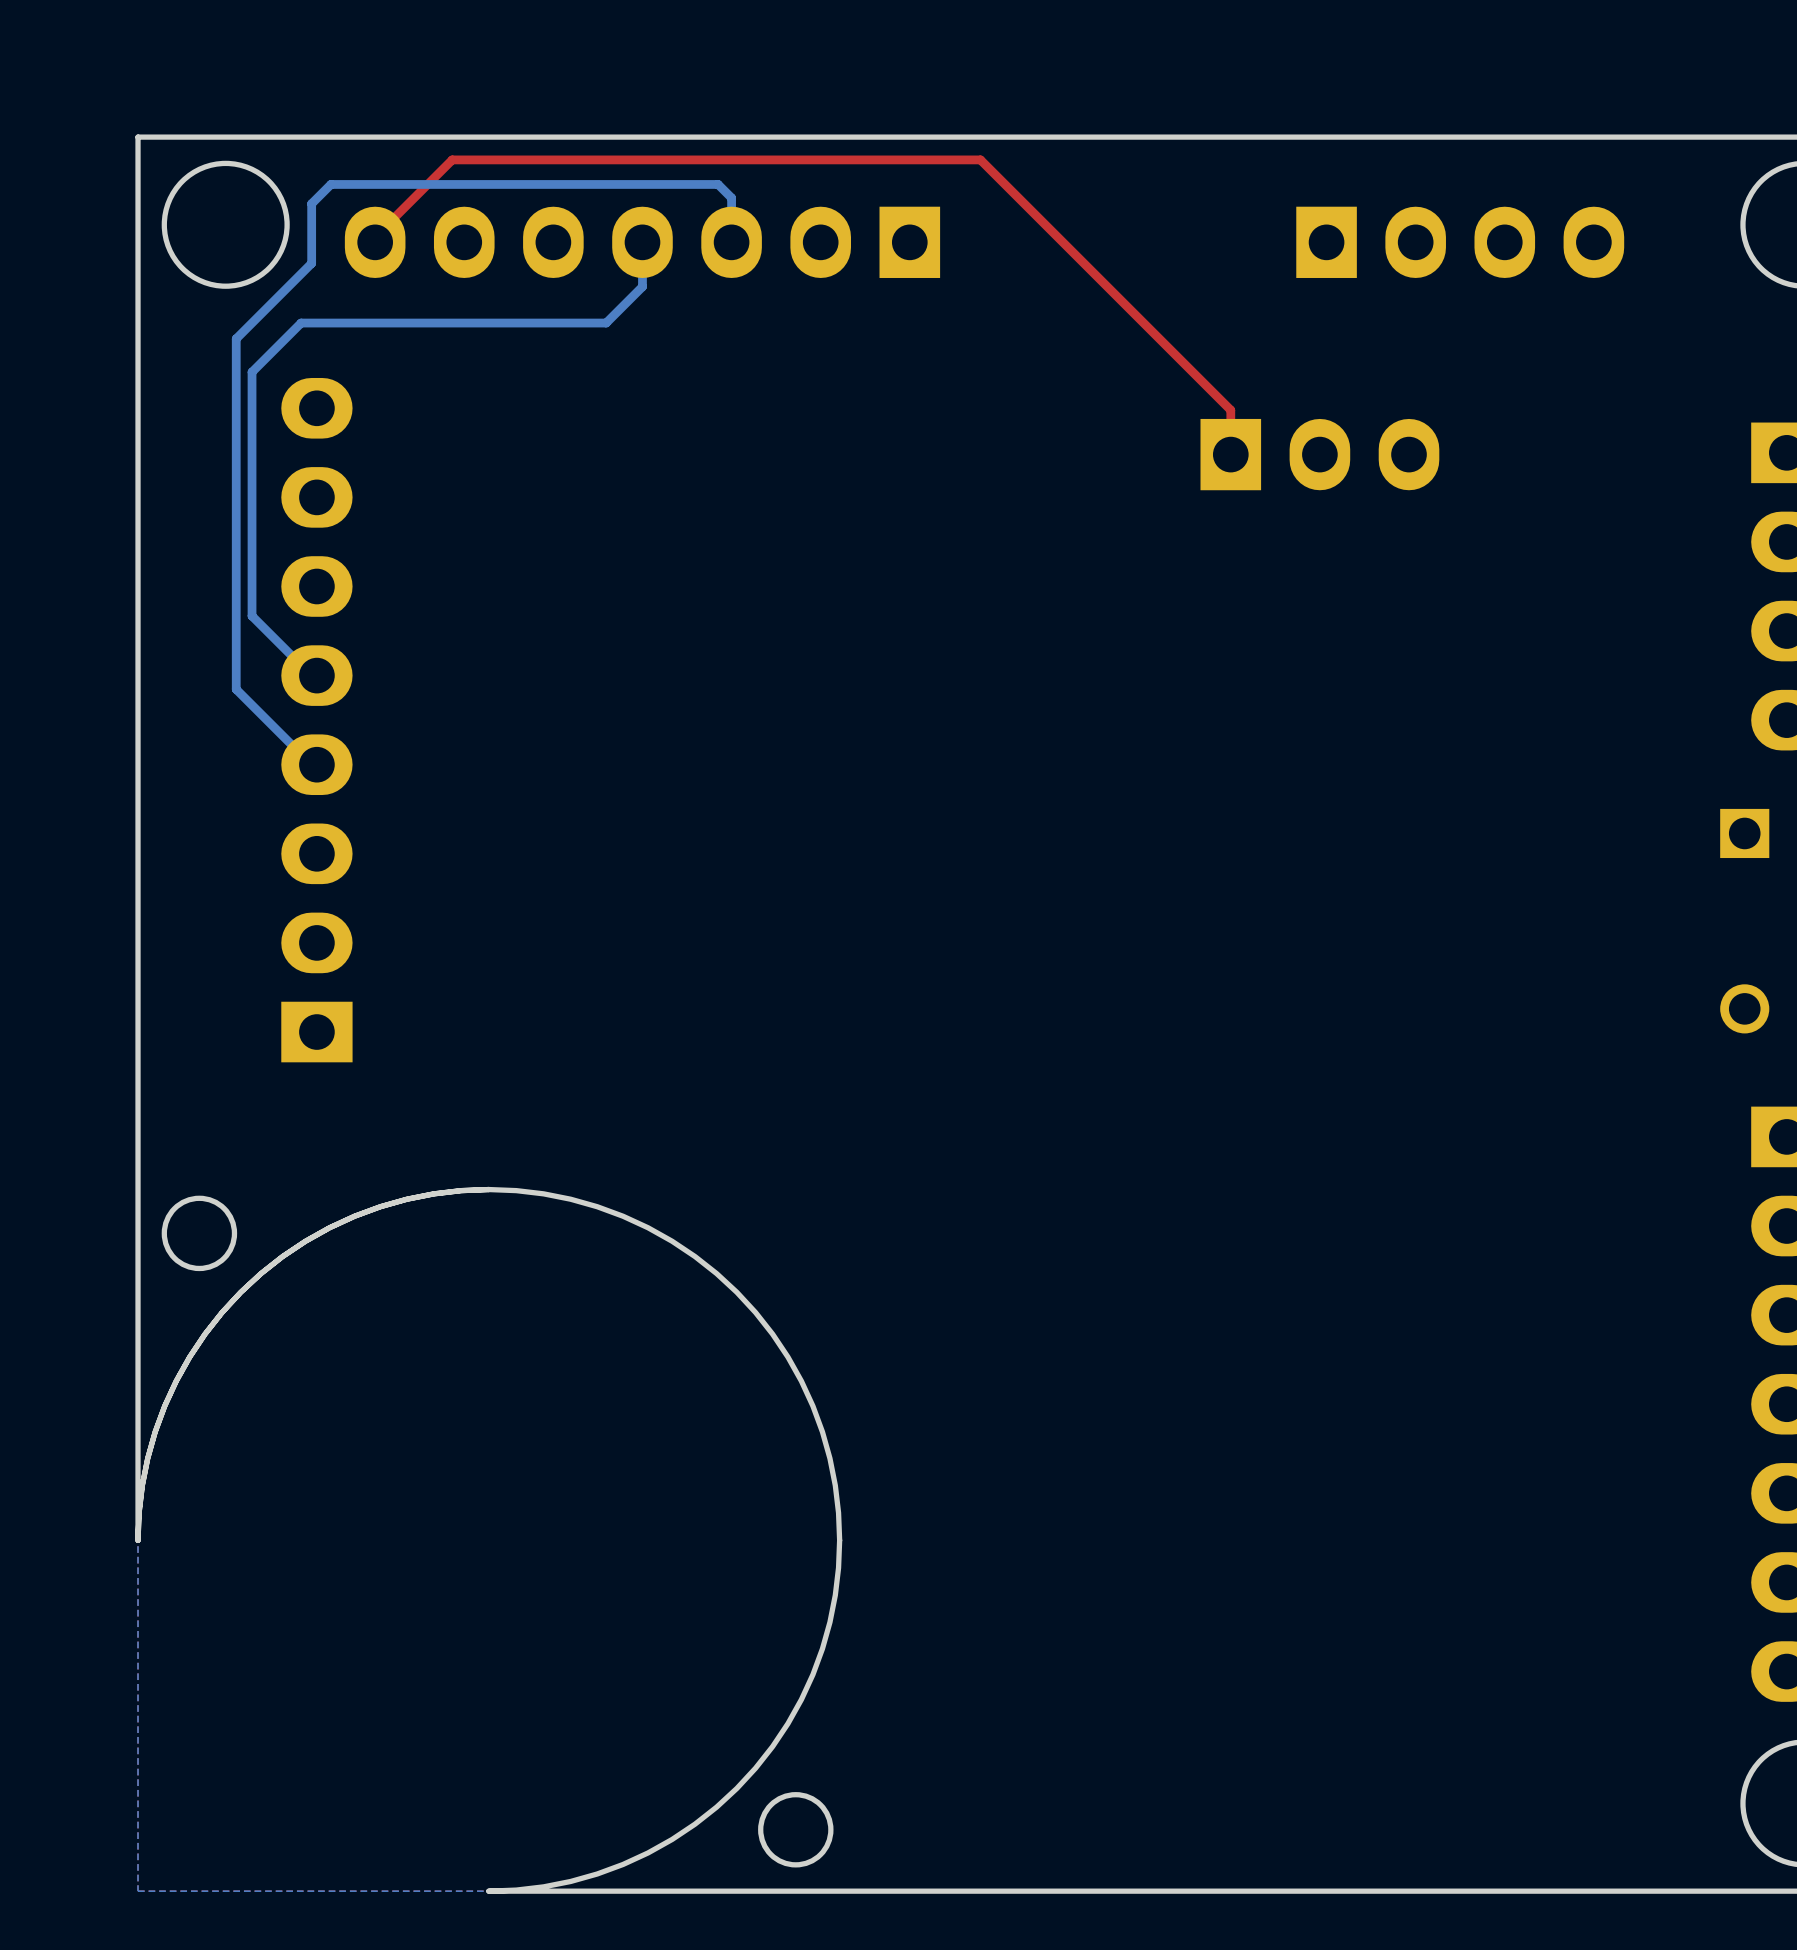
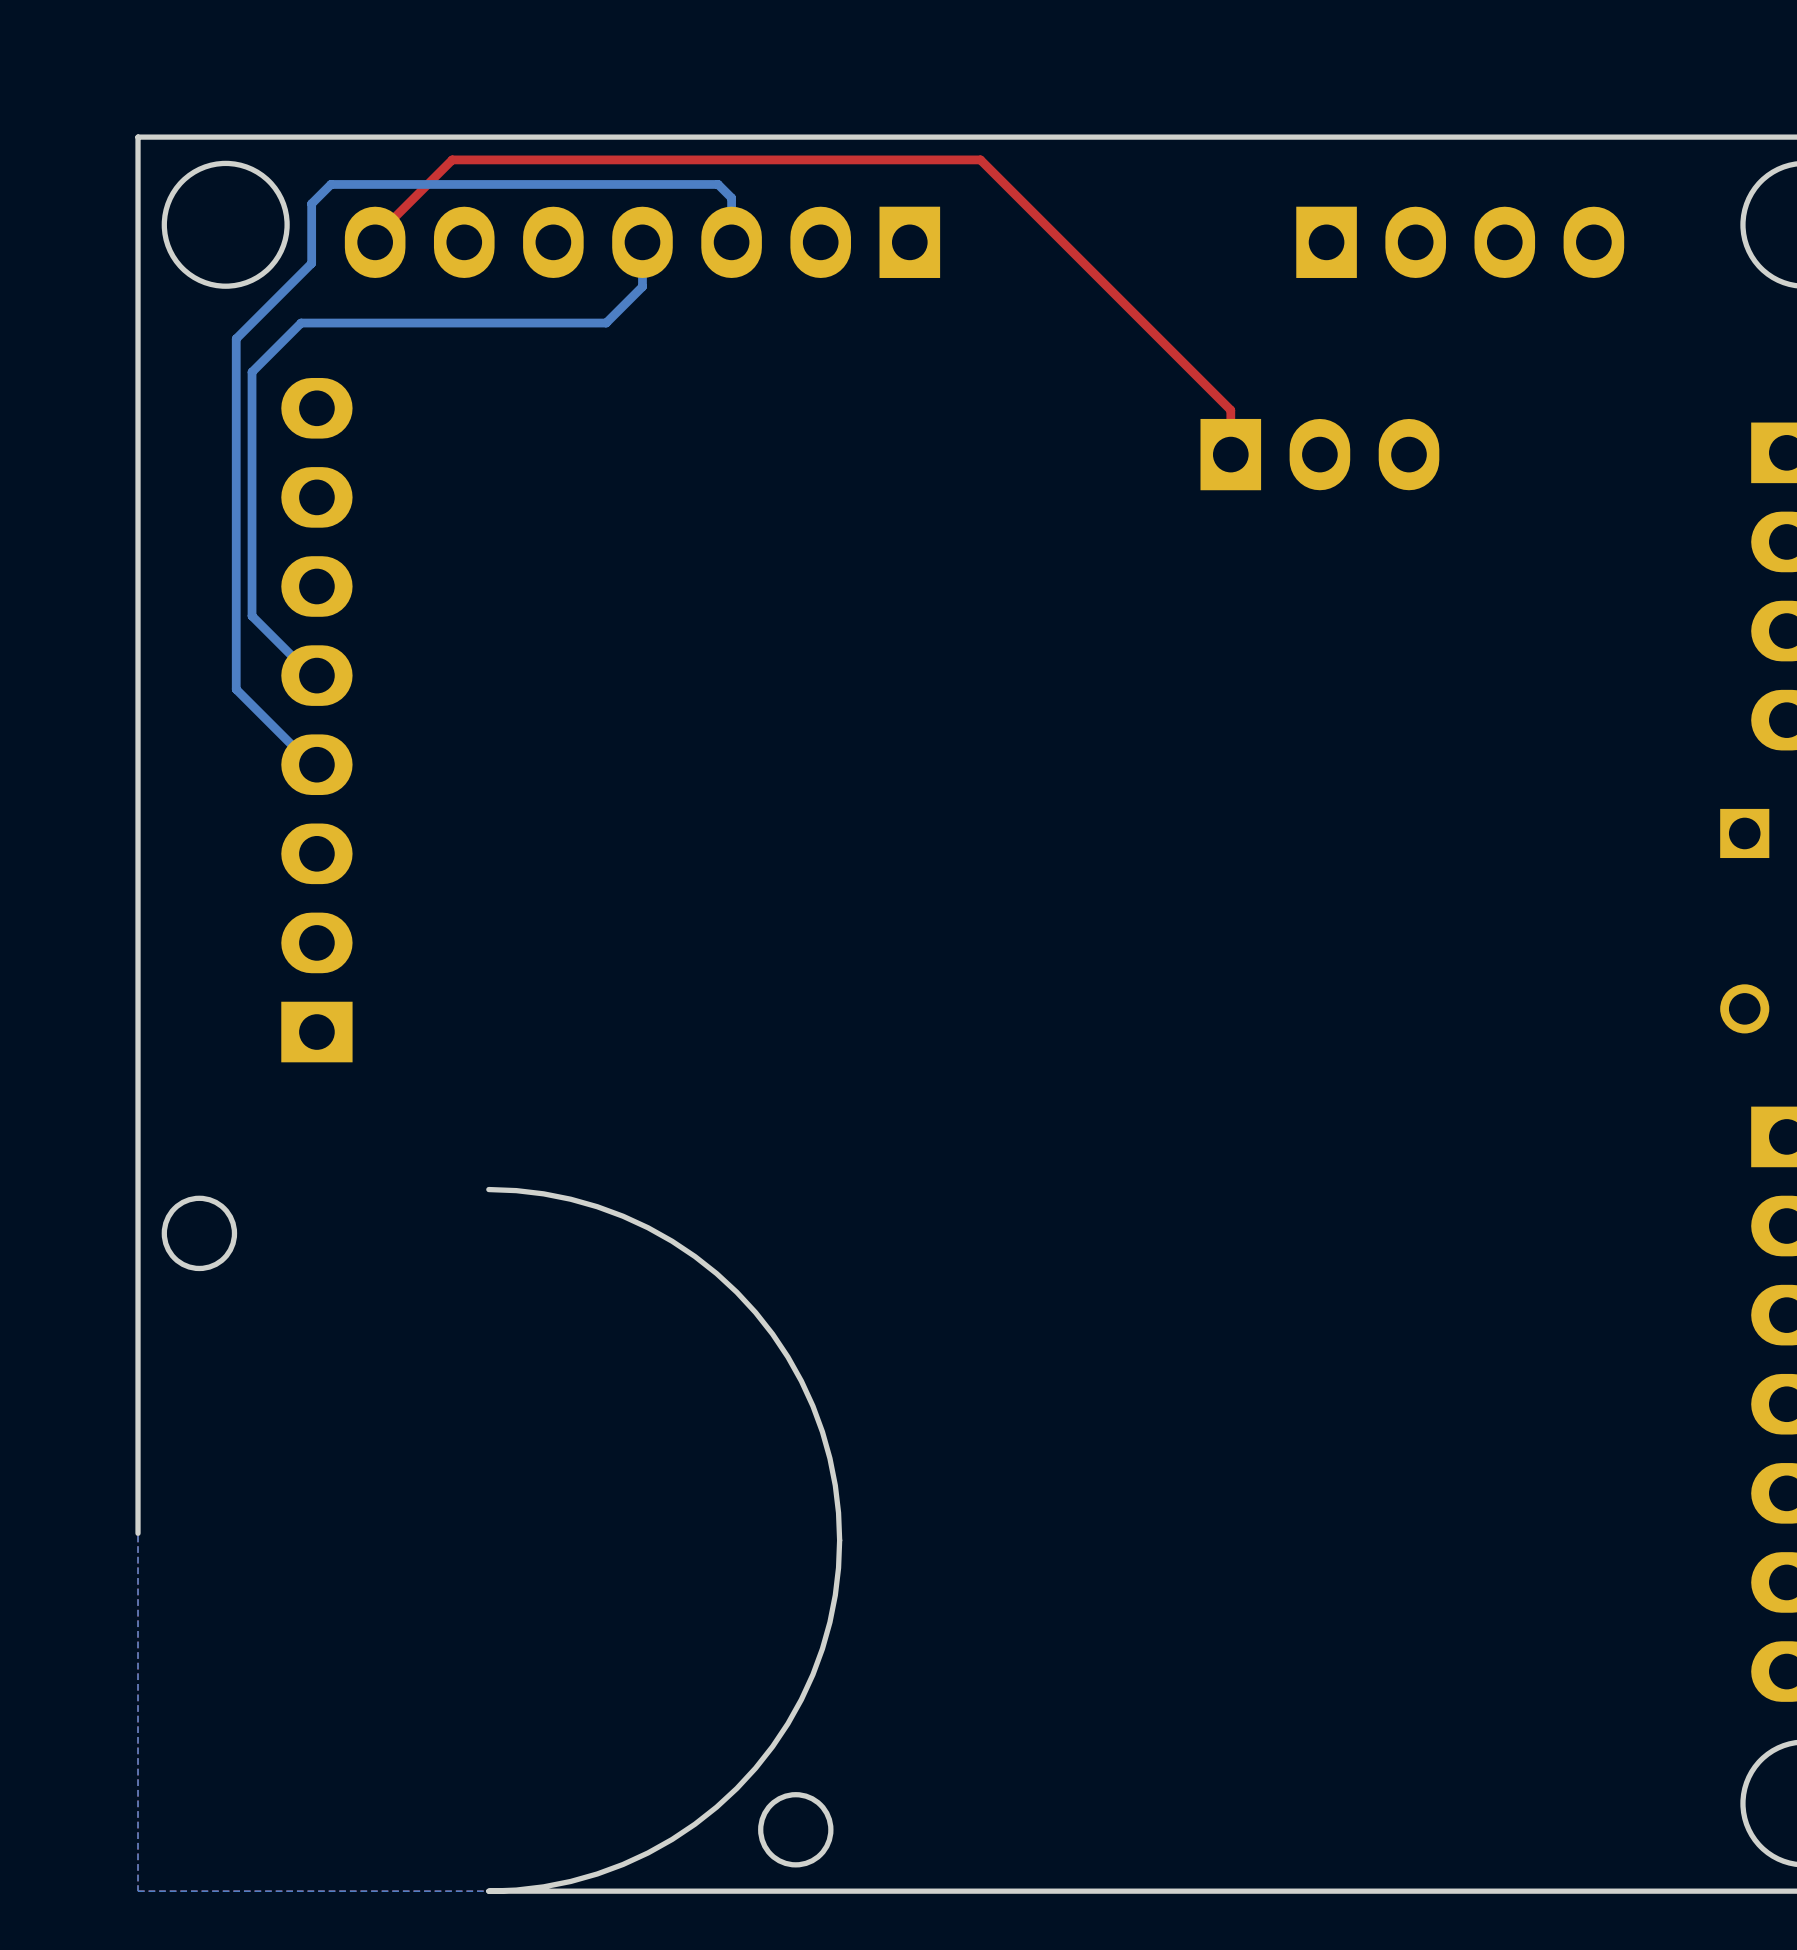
board edge: (138, 1540) (142, 1485) (147, 1458) (164, 1406) (189, 1357) (222, 1312) (240, 1292) (260, 1273) (305, 1241) (354, 1216) (406, 1199) (433, 1193) (488, 1189) (461, 1190) (433, 1193) (406, 1199) (380, 1206) (354, 1216) (329, 1227) (305, 1241) (282, 1256) (260, 1273) (240, 1292) (222, 1312) (205, 1334) (189, 1357) (176, 1381) (164, 1406) (155, 1431) (147, 1458) (142, 1485) (139, 1512) (138, 1540) -> none

